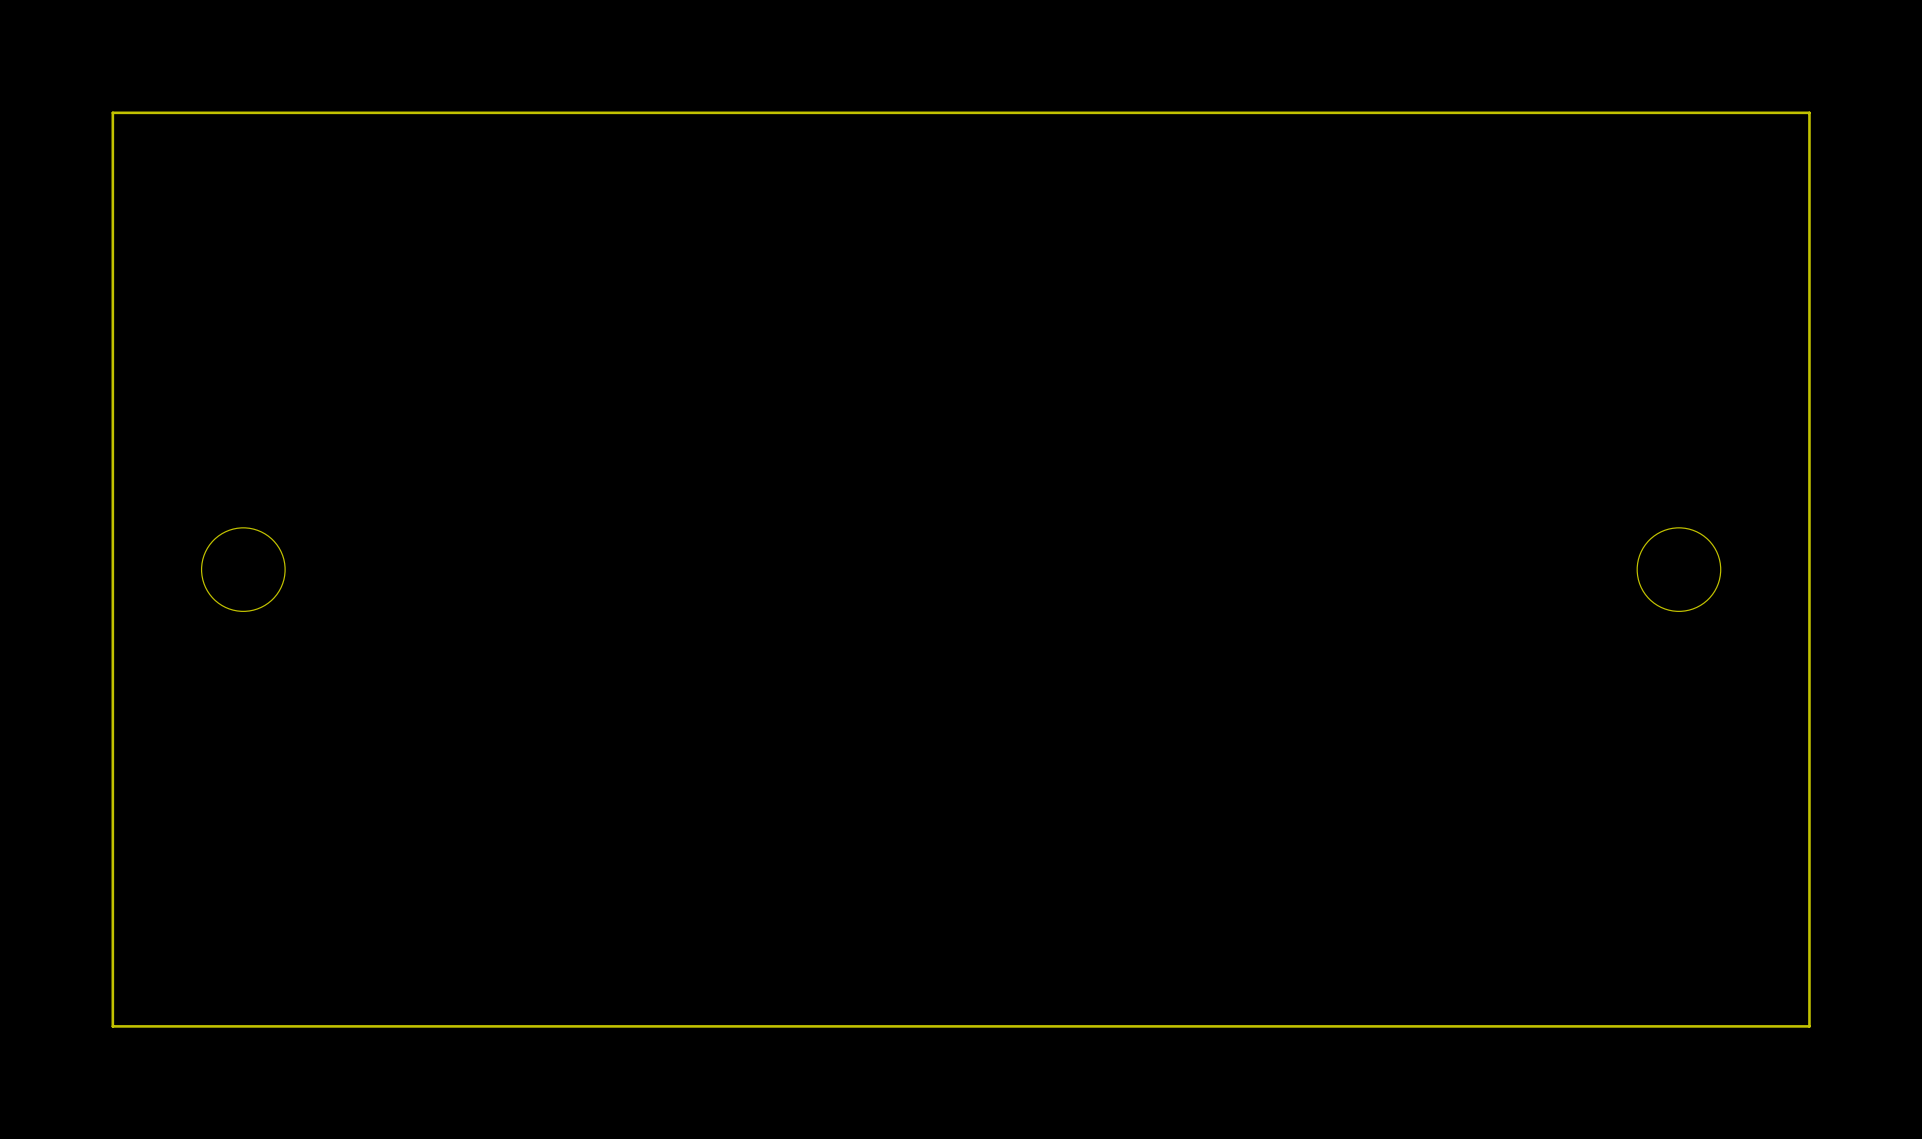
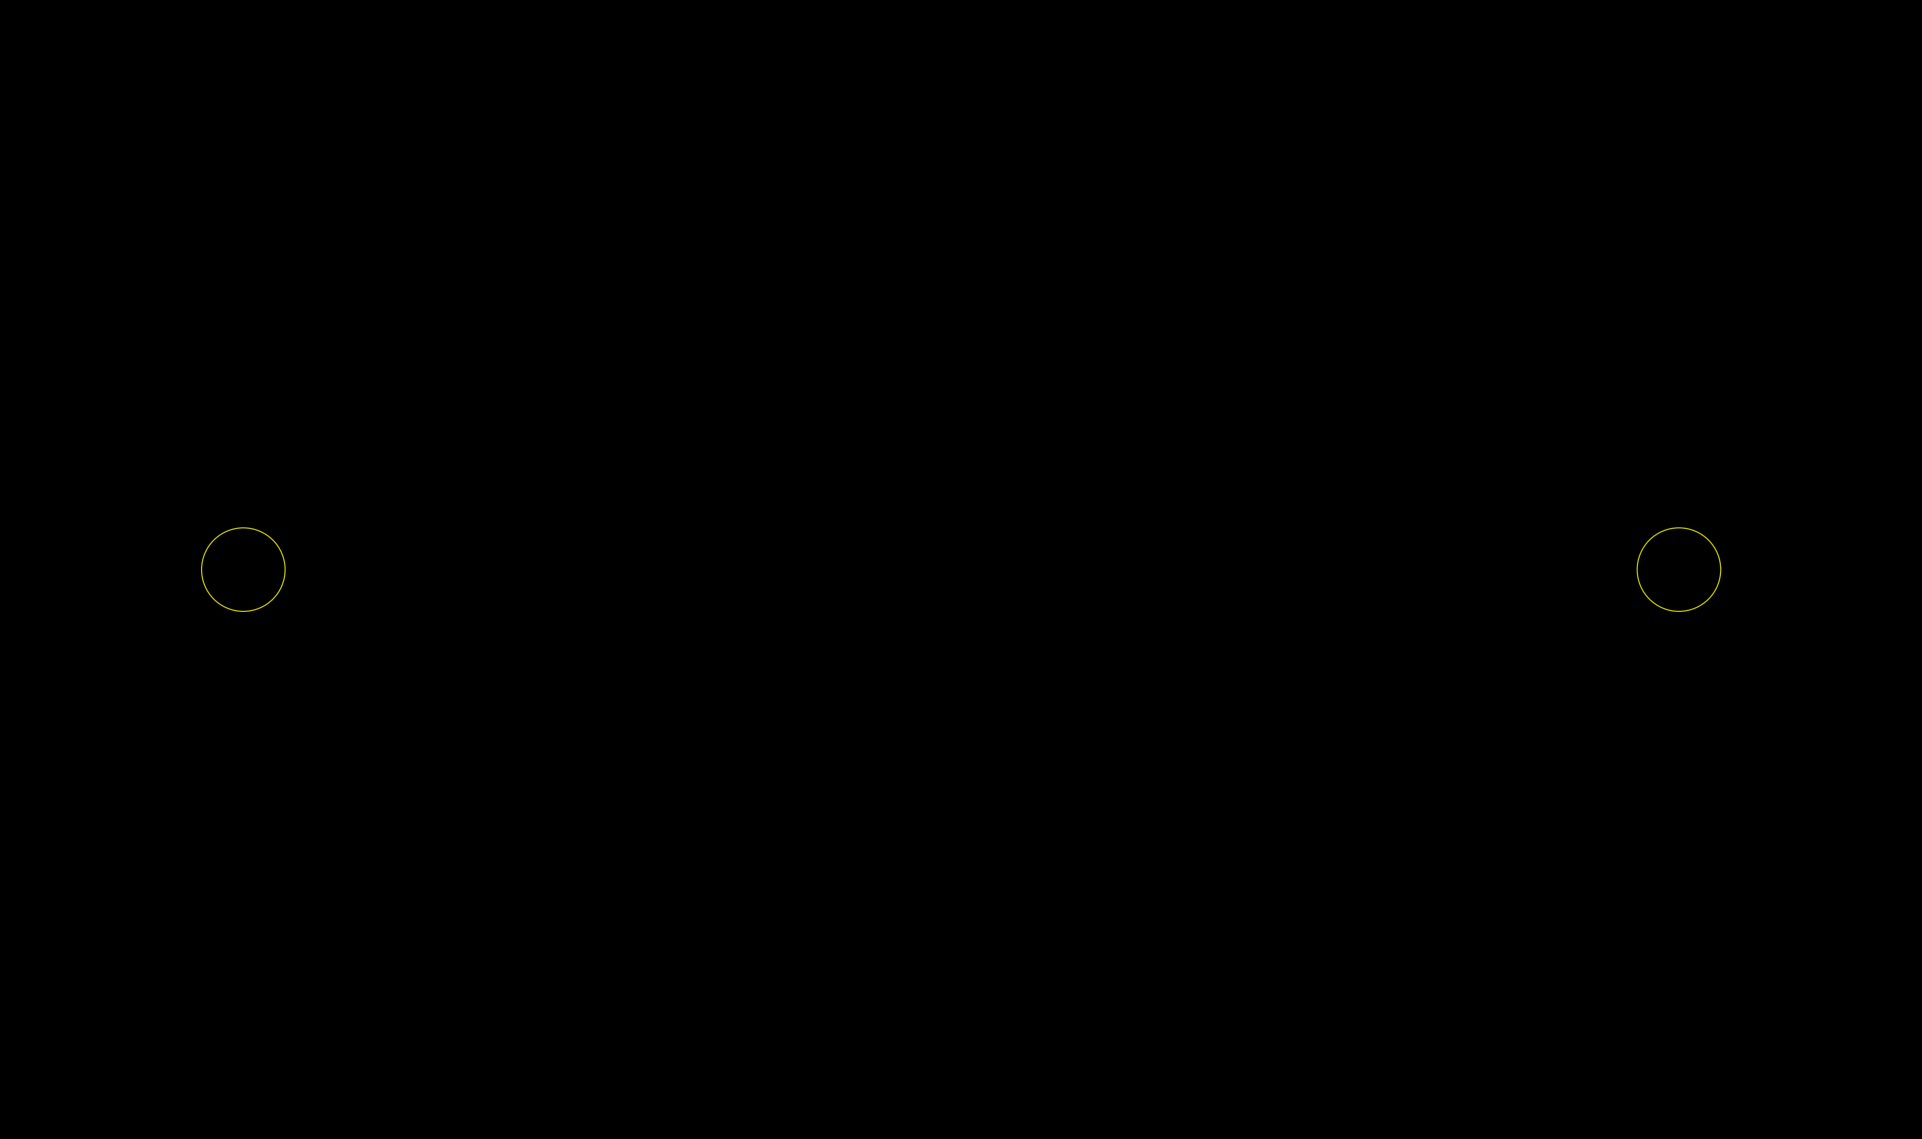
board edge: (1809, 112) (112, 112) (112, 1026) (1809, 1026) (1809, 112) -> none

